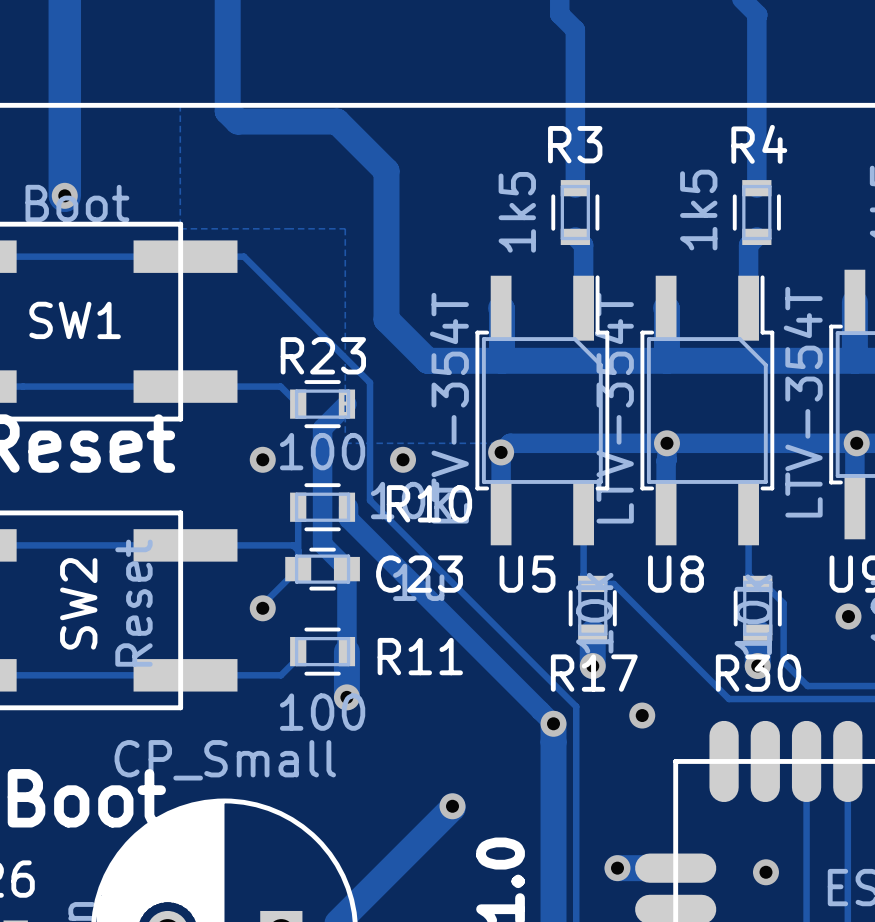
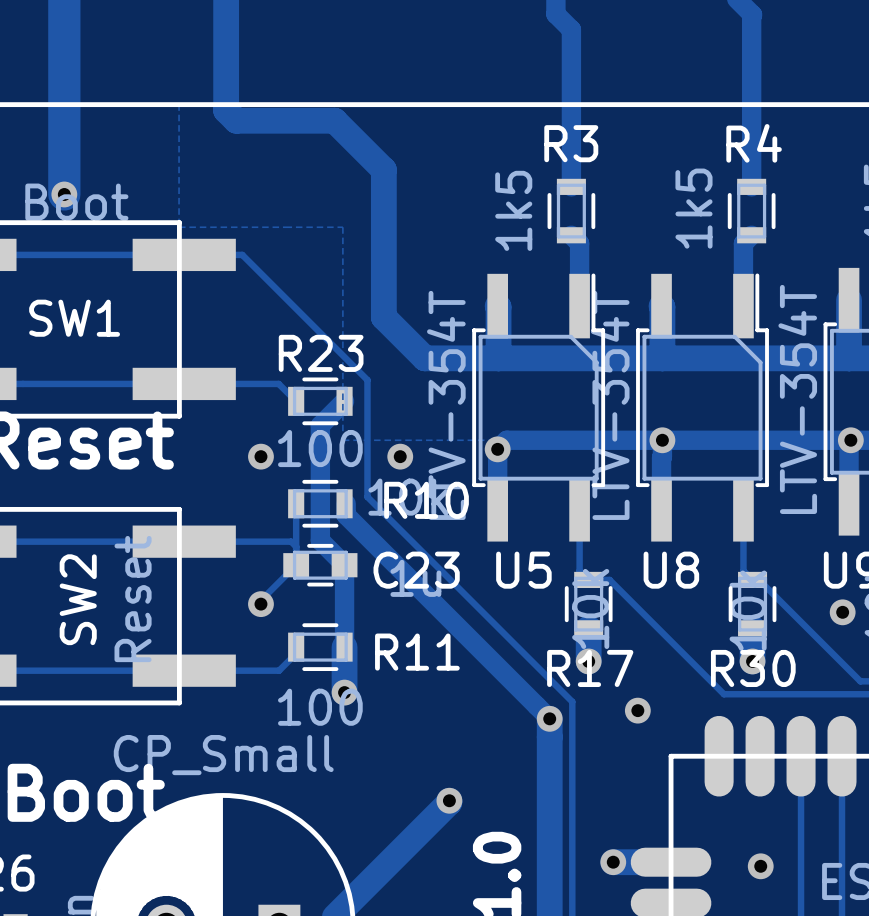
track: (783, 603) (783, 661) (807, 686) (866, 686) -> (778, 599) (860, 681)

